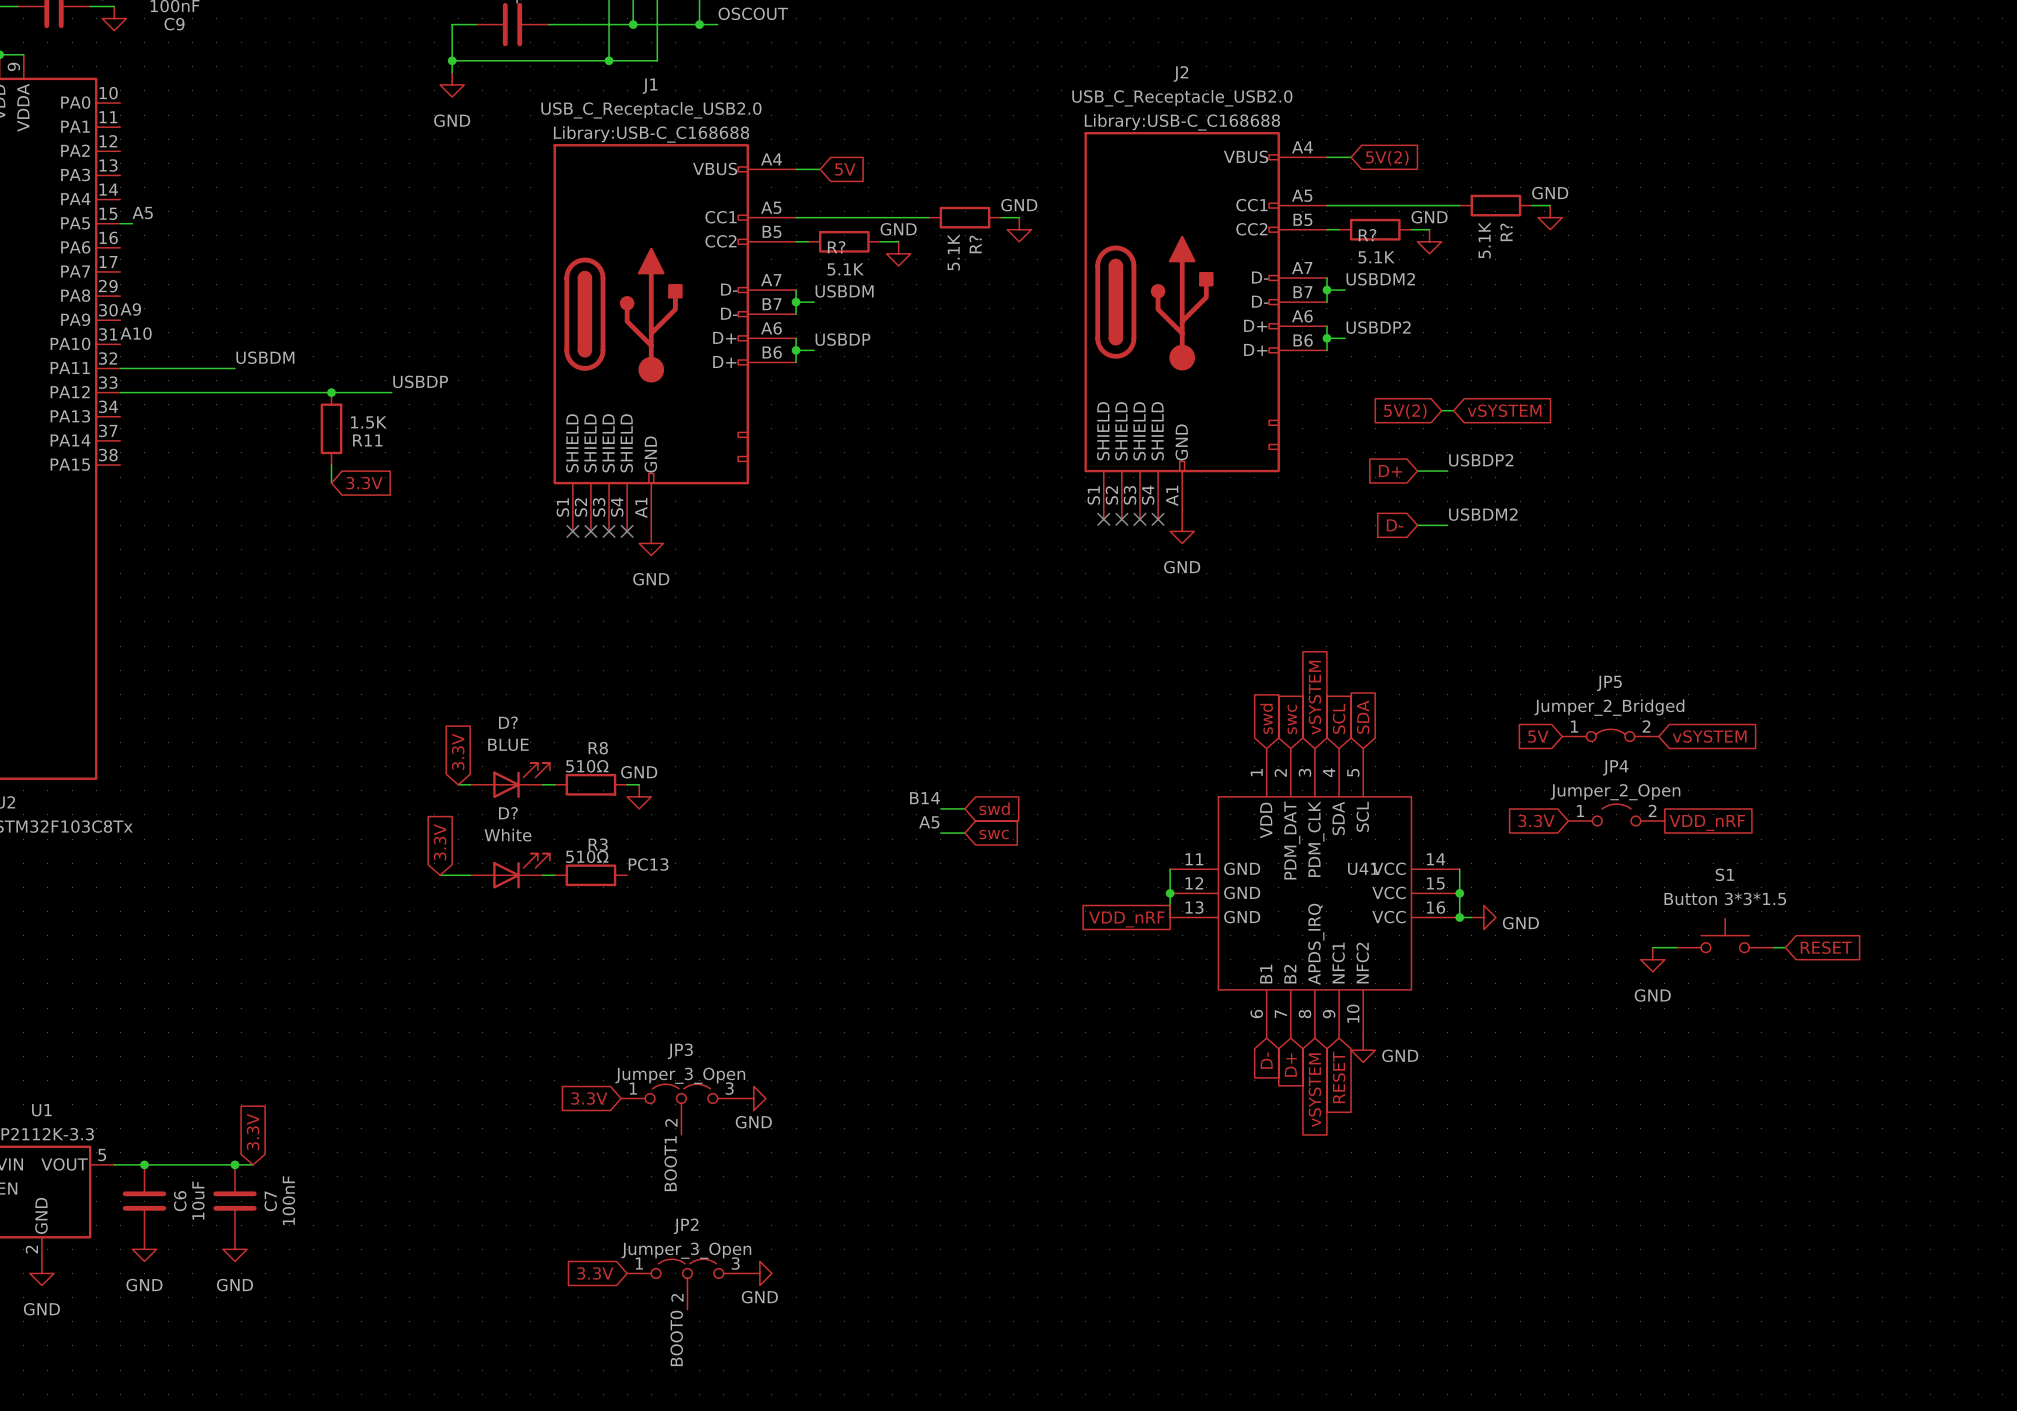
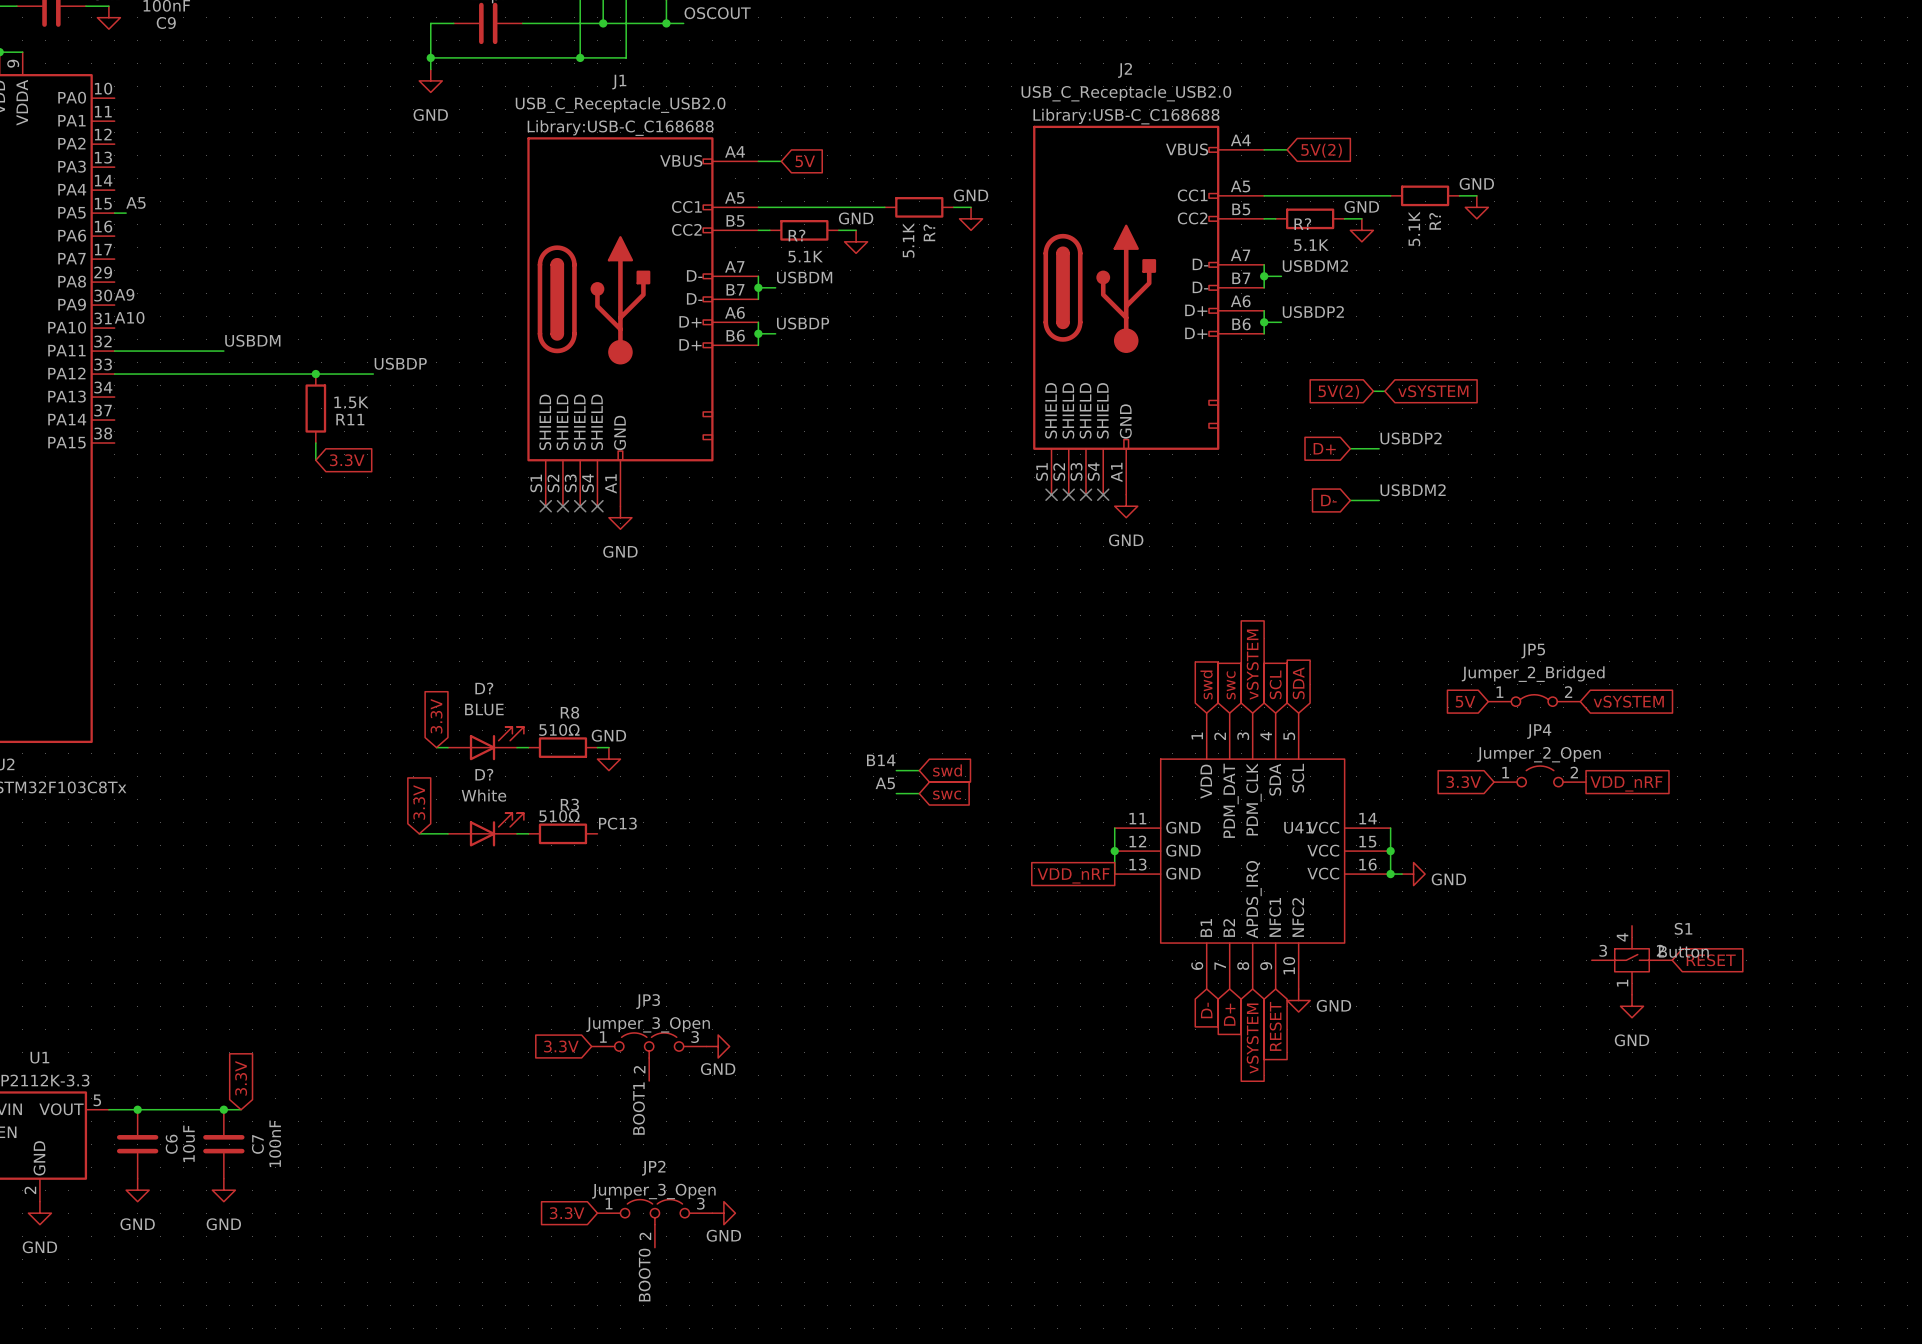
S1 name position: S1 (1724, 874) -> S1 (1683, 928)
S1 value: Button 3*3*1.5 (1725, 898) -> Button (1683, 951)
S1 symbol: [1676, 918, 1774, 953] -> [1591, 925, 1673, 995]
wire: (1652, 947) (1676, 947) -> none
wire: (1773, 947) (1785, 947) -> none
global label position: RESET (1826, 947) -> RESET (1711, 960)
power symbol position: GND (1652, 959) -> GND (1632, 1006)

